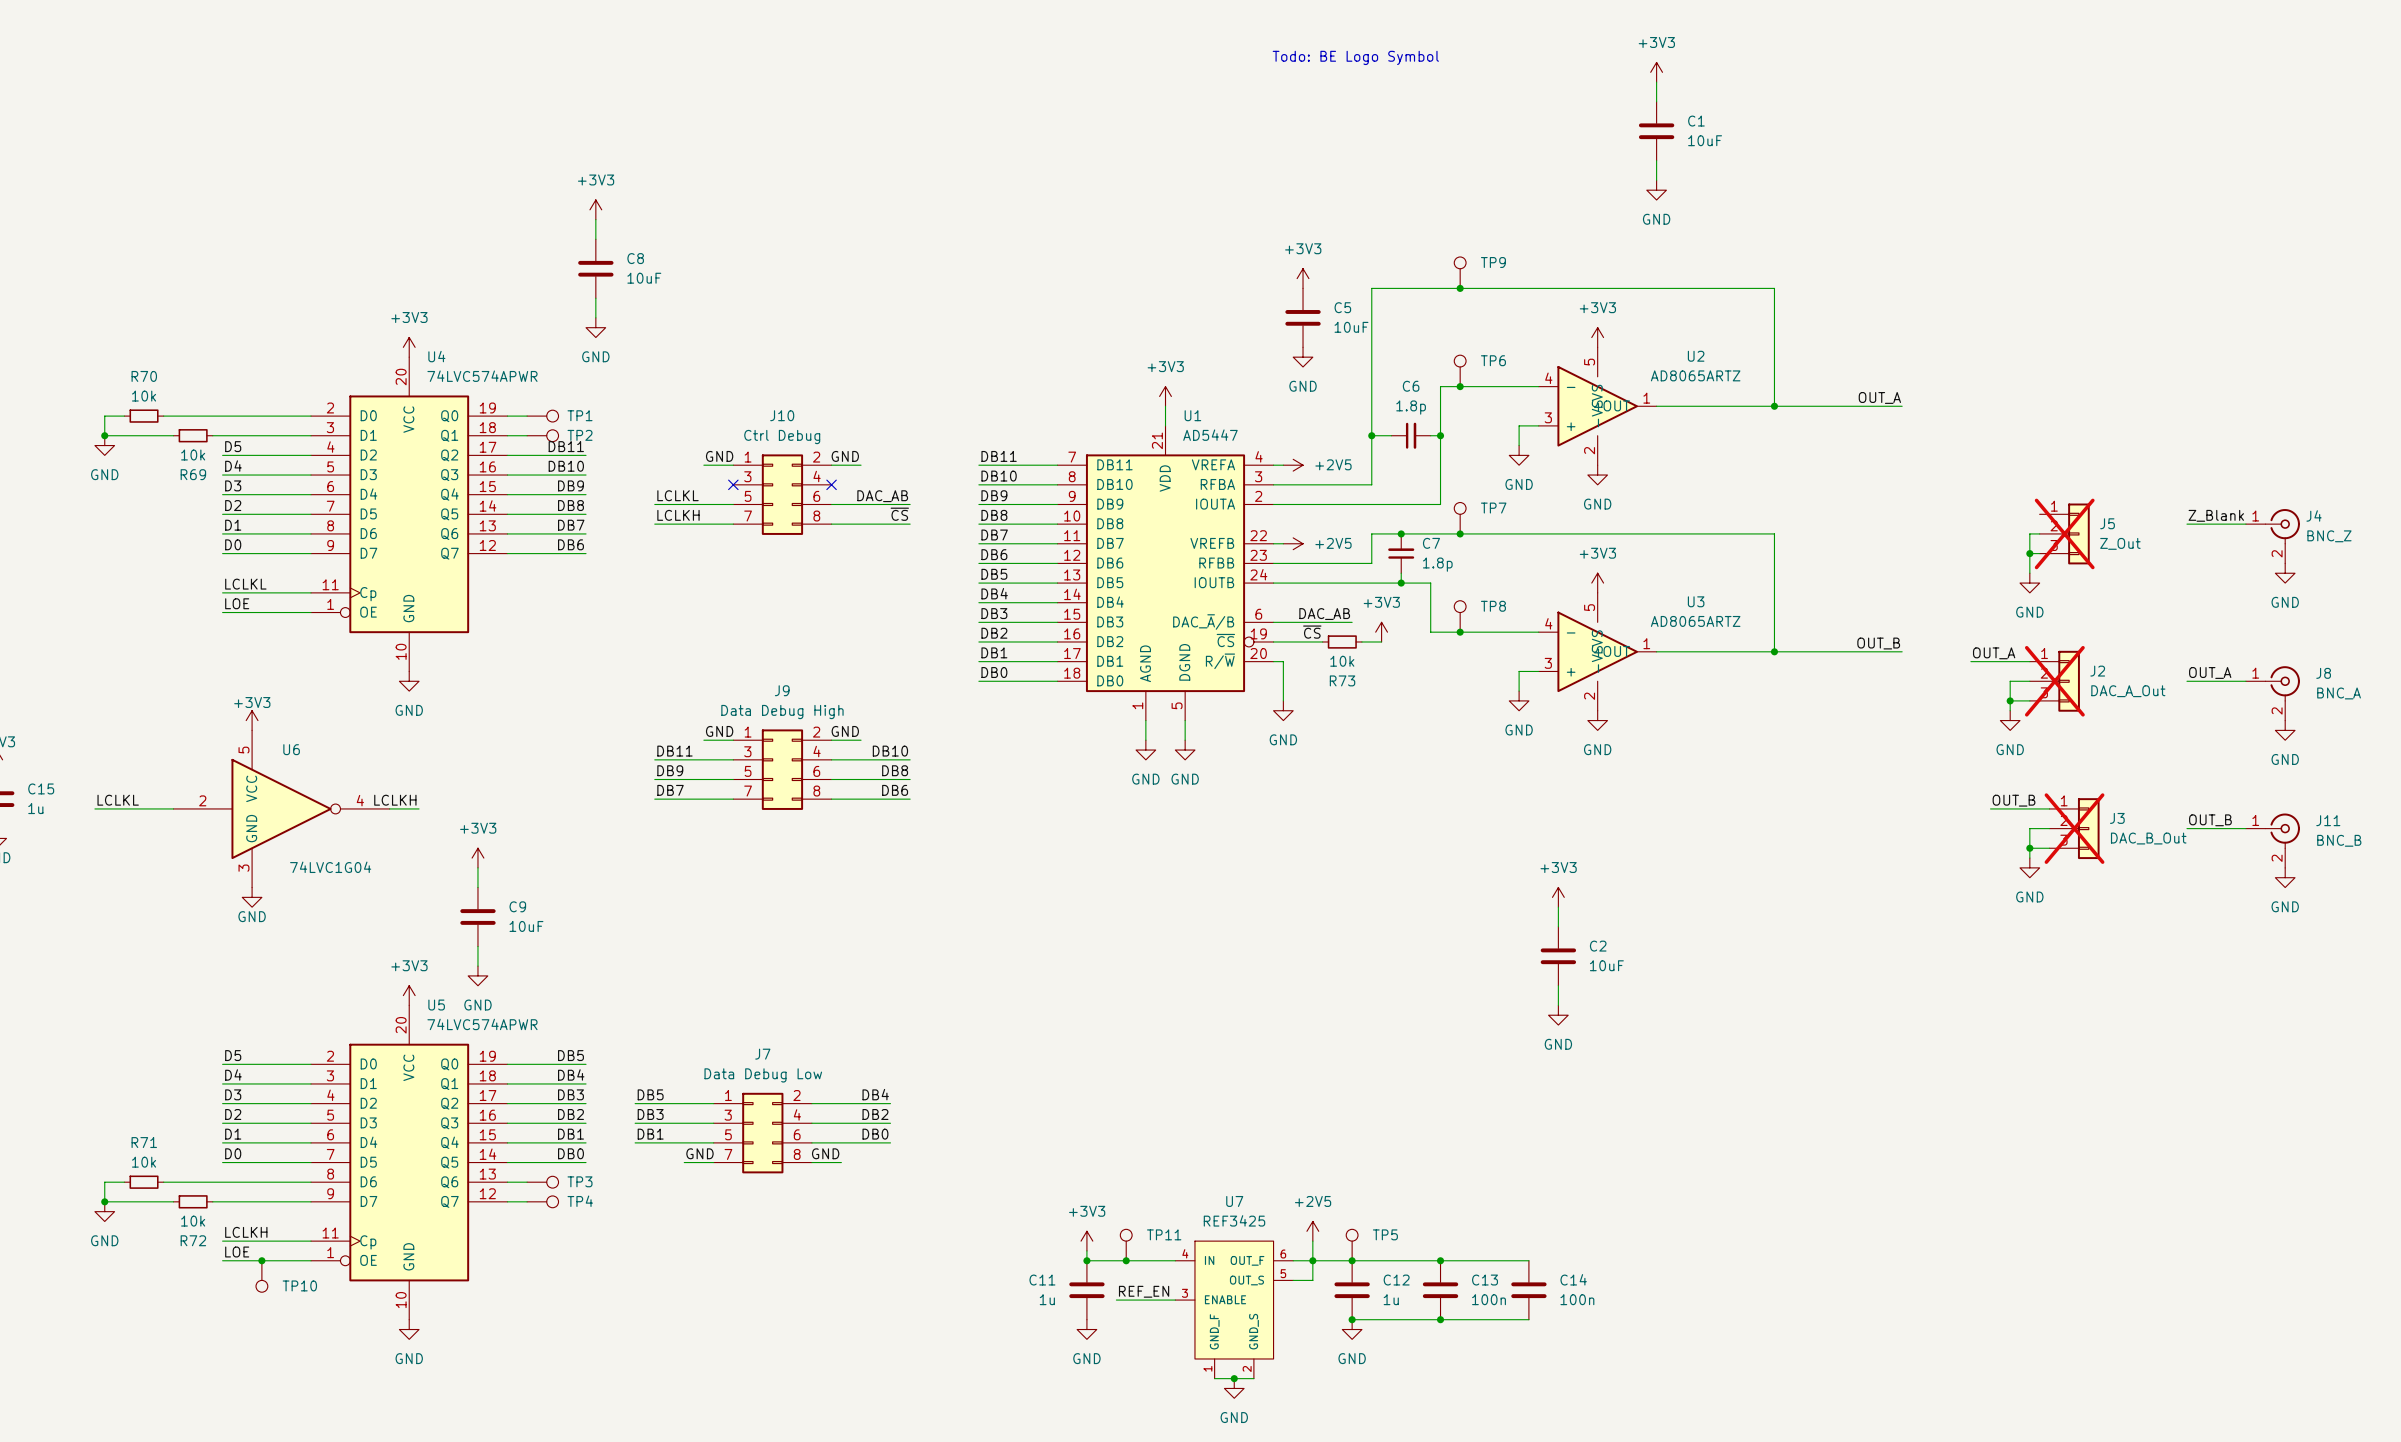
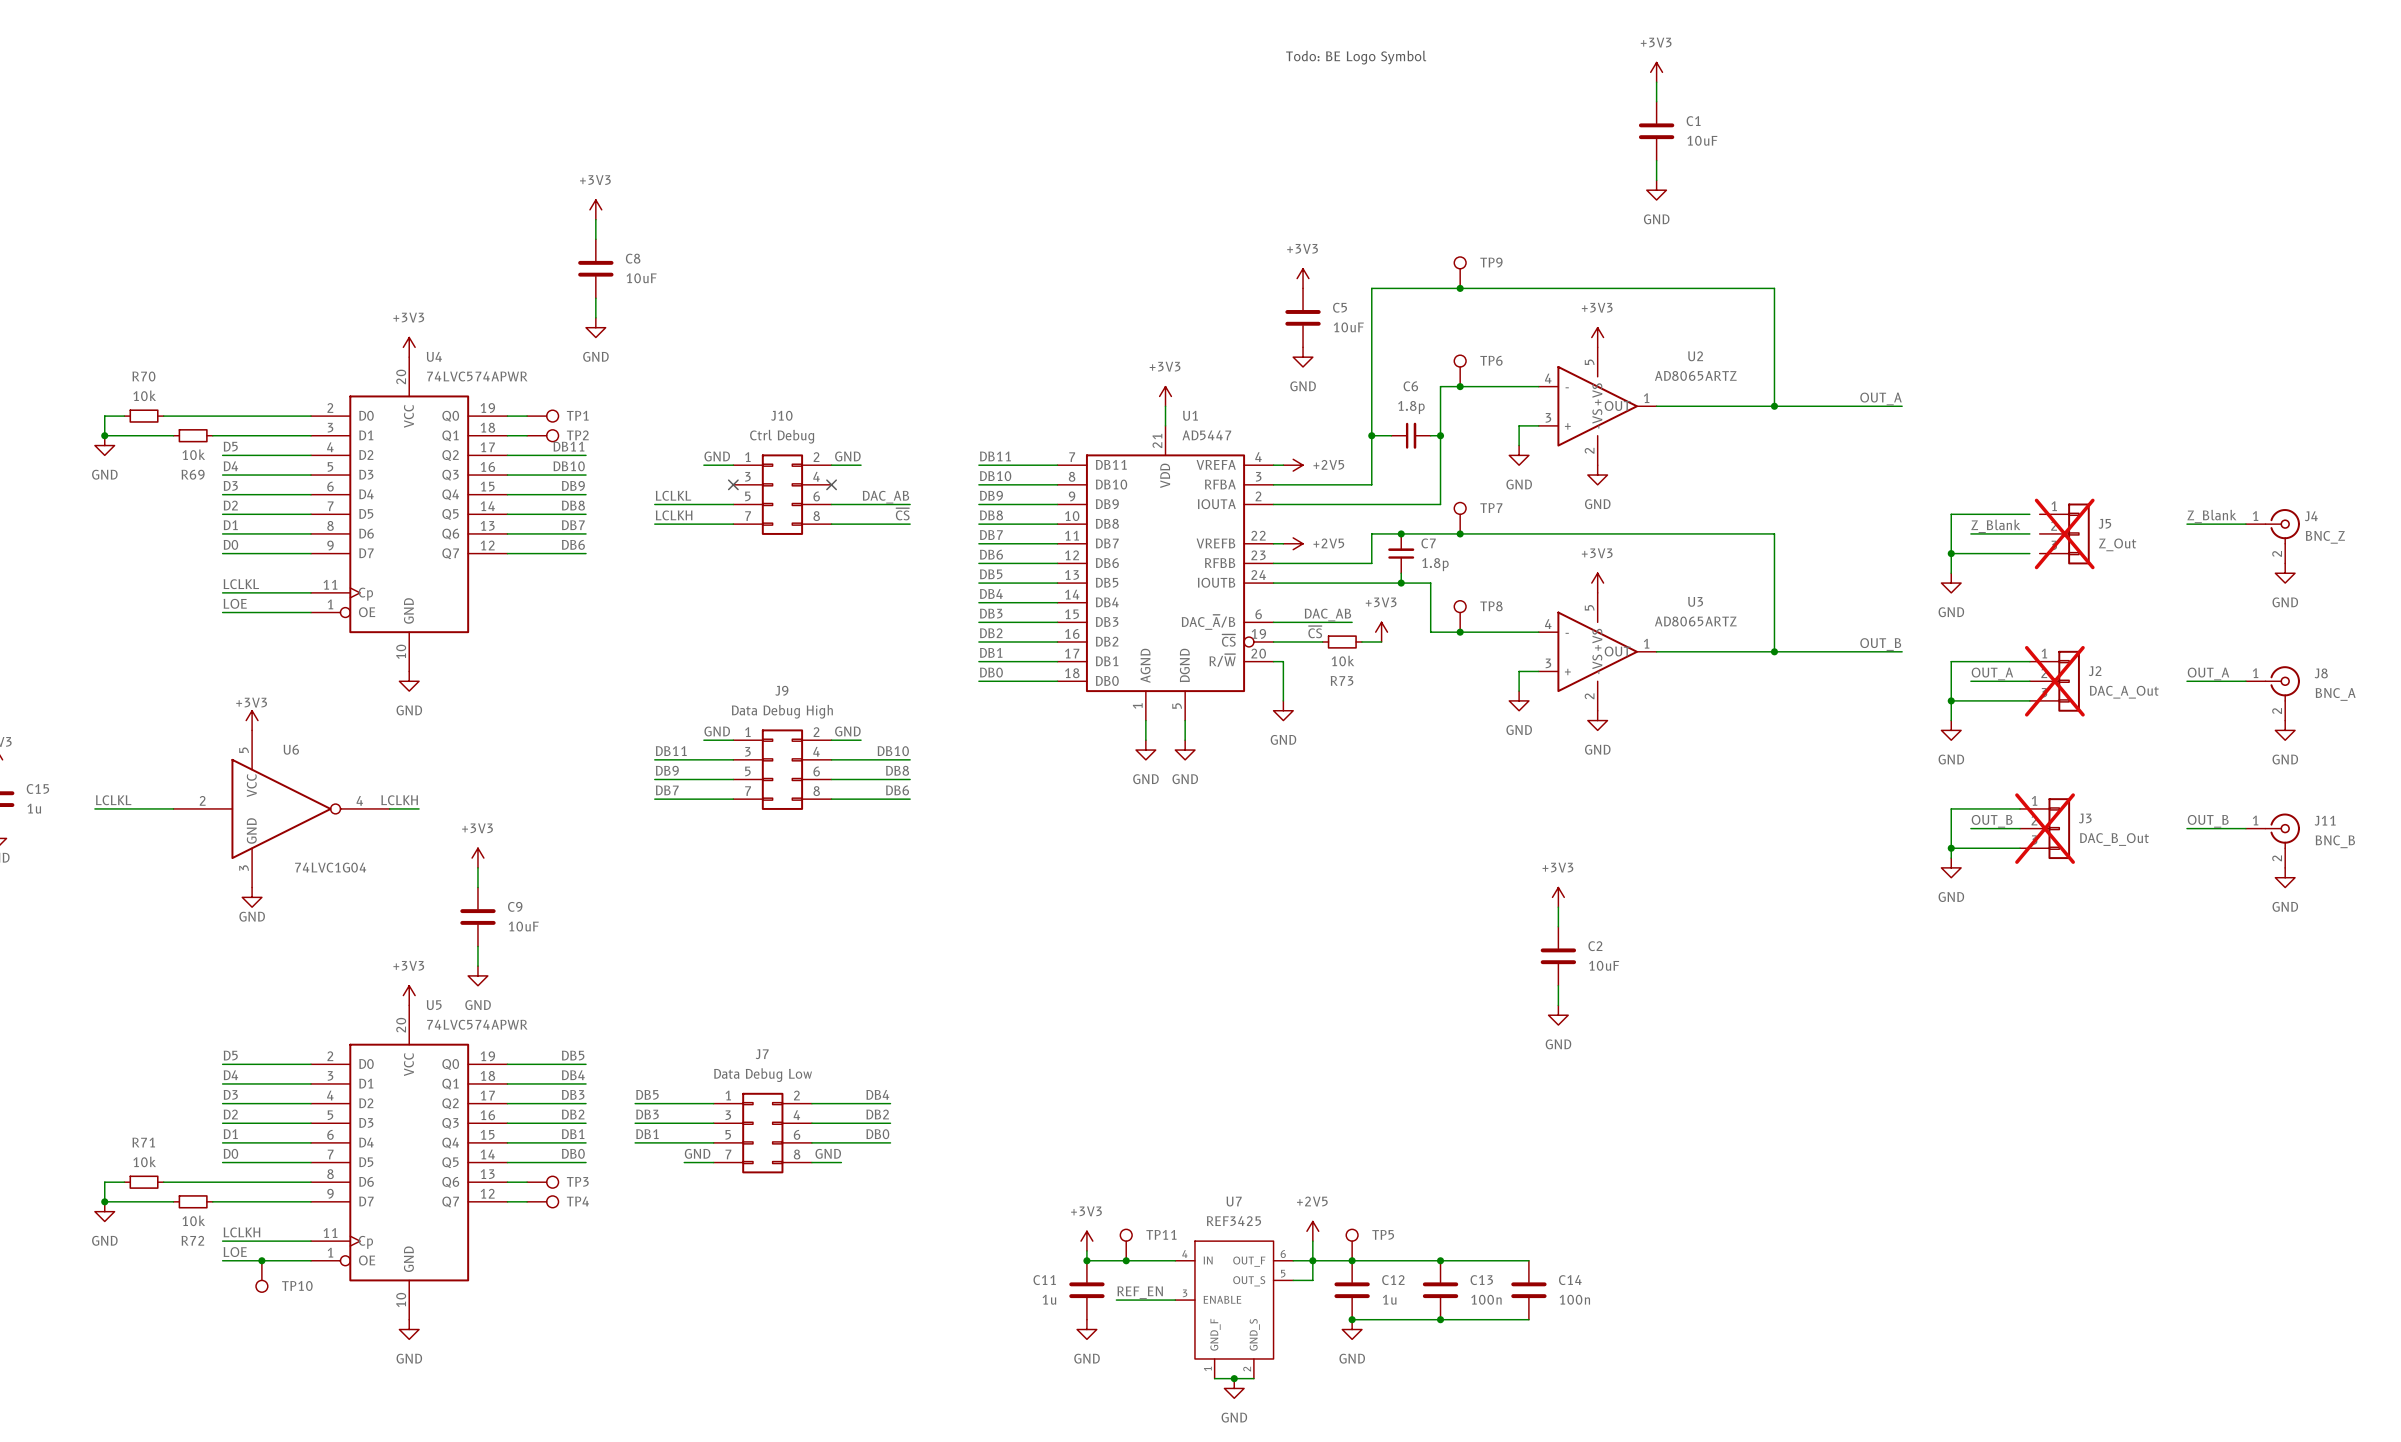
wire: none -> (2029, 514) (1951, 514) (1951, 573)
label: none -> Z_Blank (1995, 526)
wire: none -> (1970, 533) (2029, 533)
wire: (2039, 533) (2029, 533) (2029, 573) -> none
junction: none -> (1951, 553)
wire: (2029, 553) (2039, 553) -> (2029, 553) (1951, 553)
junction: (2029, 553) -> none
power symbol: none -> GND (1951, 583)
power symbol: GND (2029, 583) -> none
label position: OUT_A (1994, 653) -> OUT_A (1992, 673)
wire: none -> (1970, 661) (1951, 661) (1951, 720)
wire: (2010, 681) (2010, 710) -> (2010, 681) (1970, 681)
wire: none -> (1951, 700) (2010, 700)
junction: none -> (1951, 700)
junction: (2010, 700) -> none
power symbol position: GND (2010, 720) -> GND (1951, 730)
label position: OUT_B (2014, 800) -> OUT_B (1992, 821)
wire: none -> (1990, 808) (1951, 808) (1951, 858)
wire: none -> (1970, 828) (2020, 828)
J3 position: (2074, 828) -> (2045, 828)
wire: none -> (1951, 848) (2020, 848)
junction: none -> (1951, 848)
junction: (2029, 848) -> none
power symbol position: GND (2029, 867) -> GND (1951, 867)

